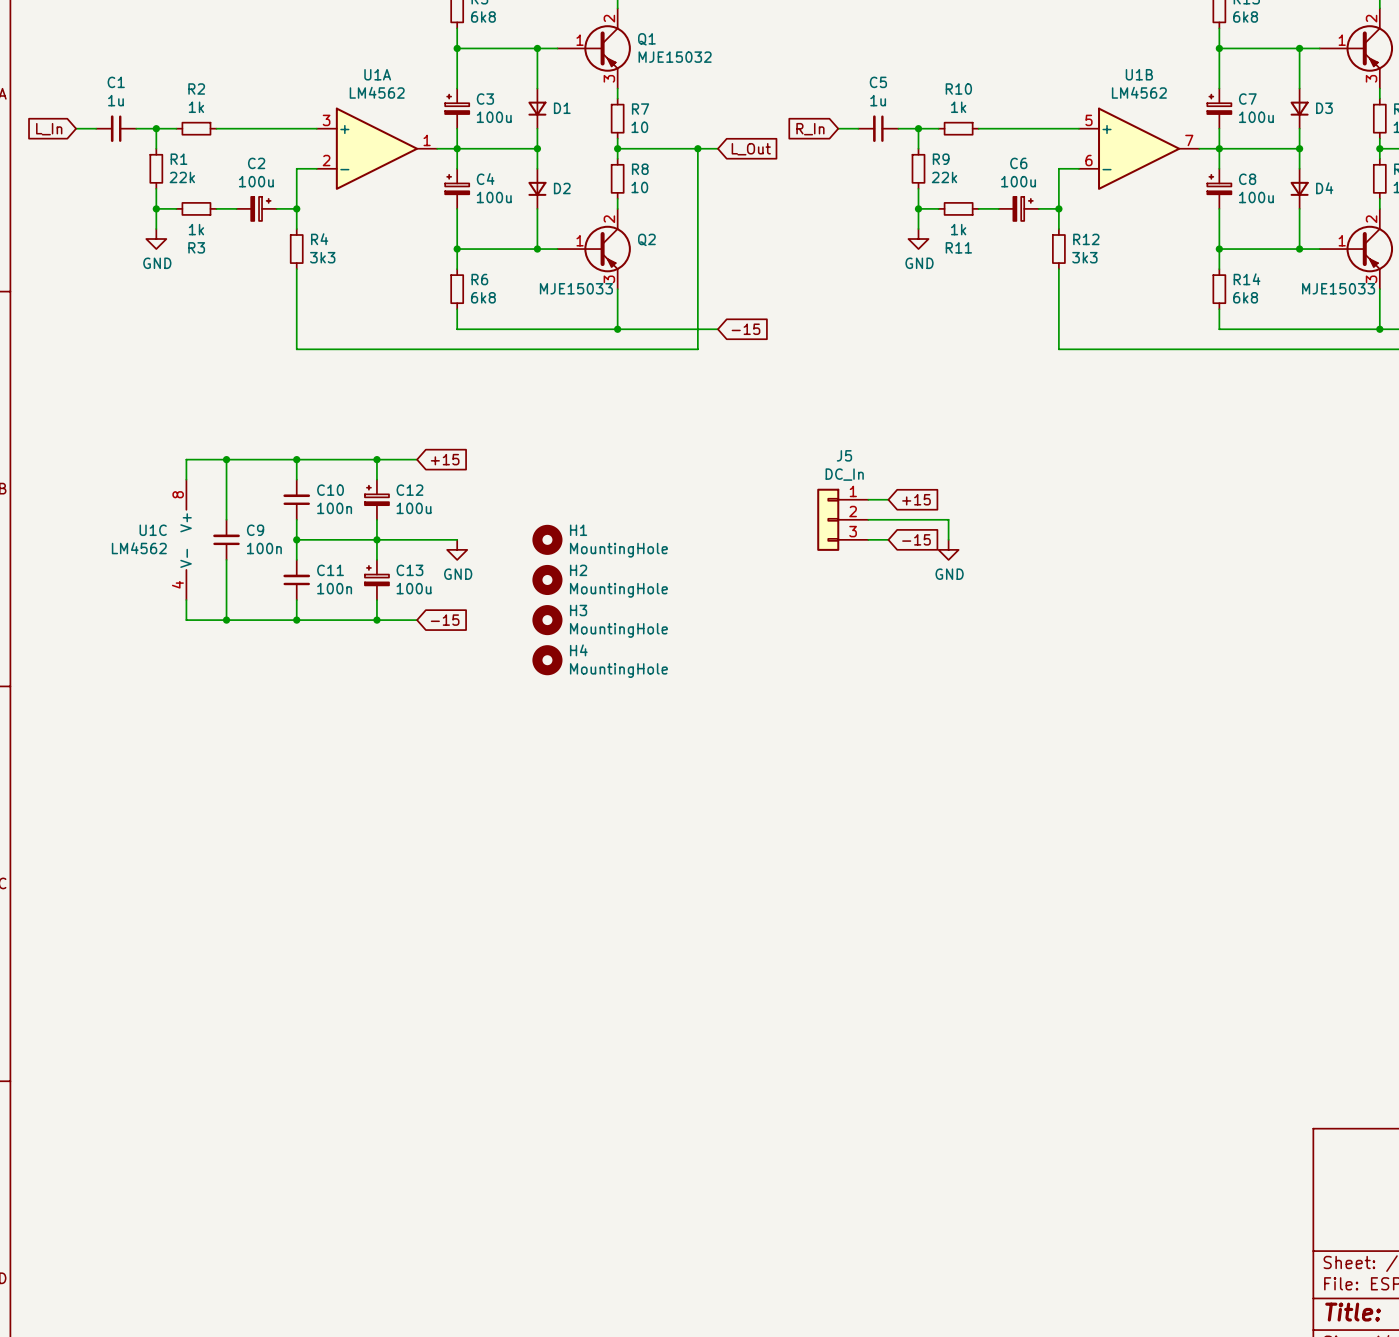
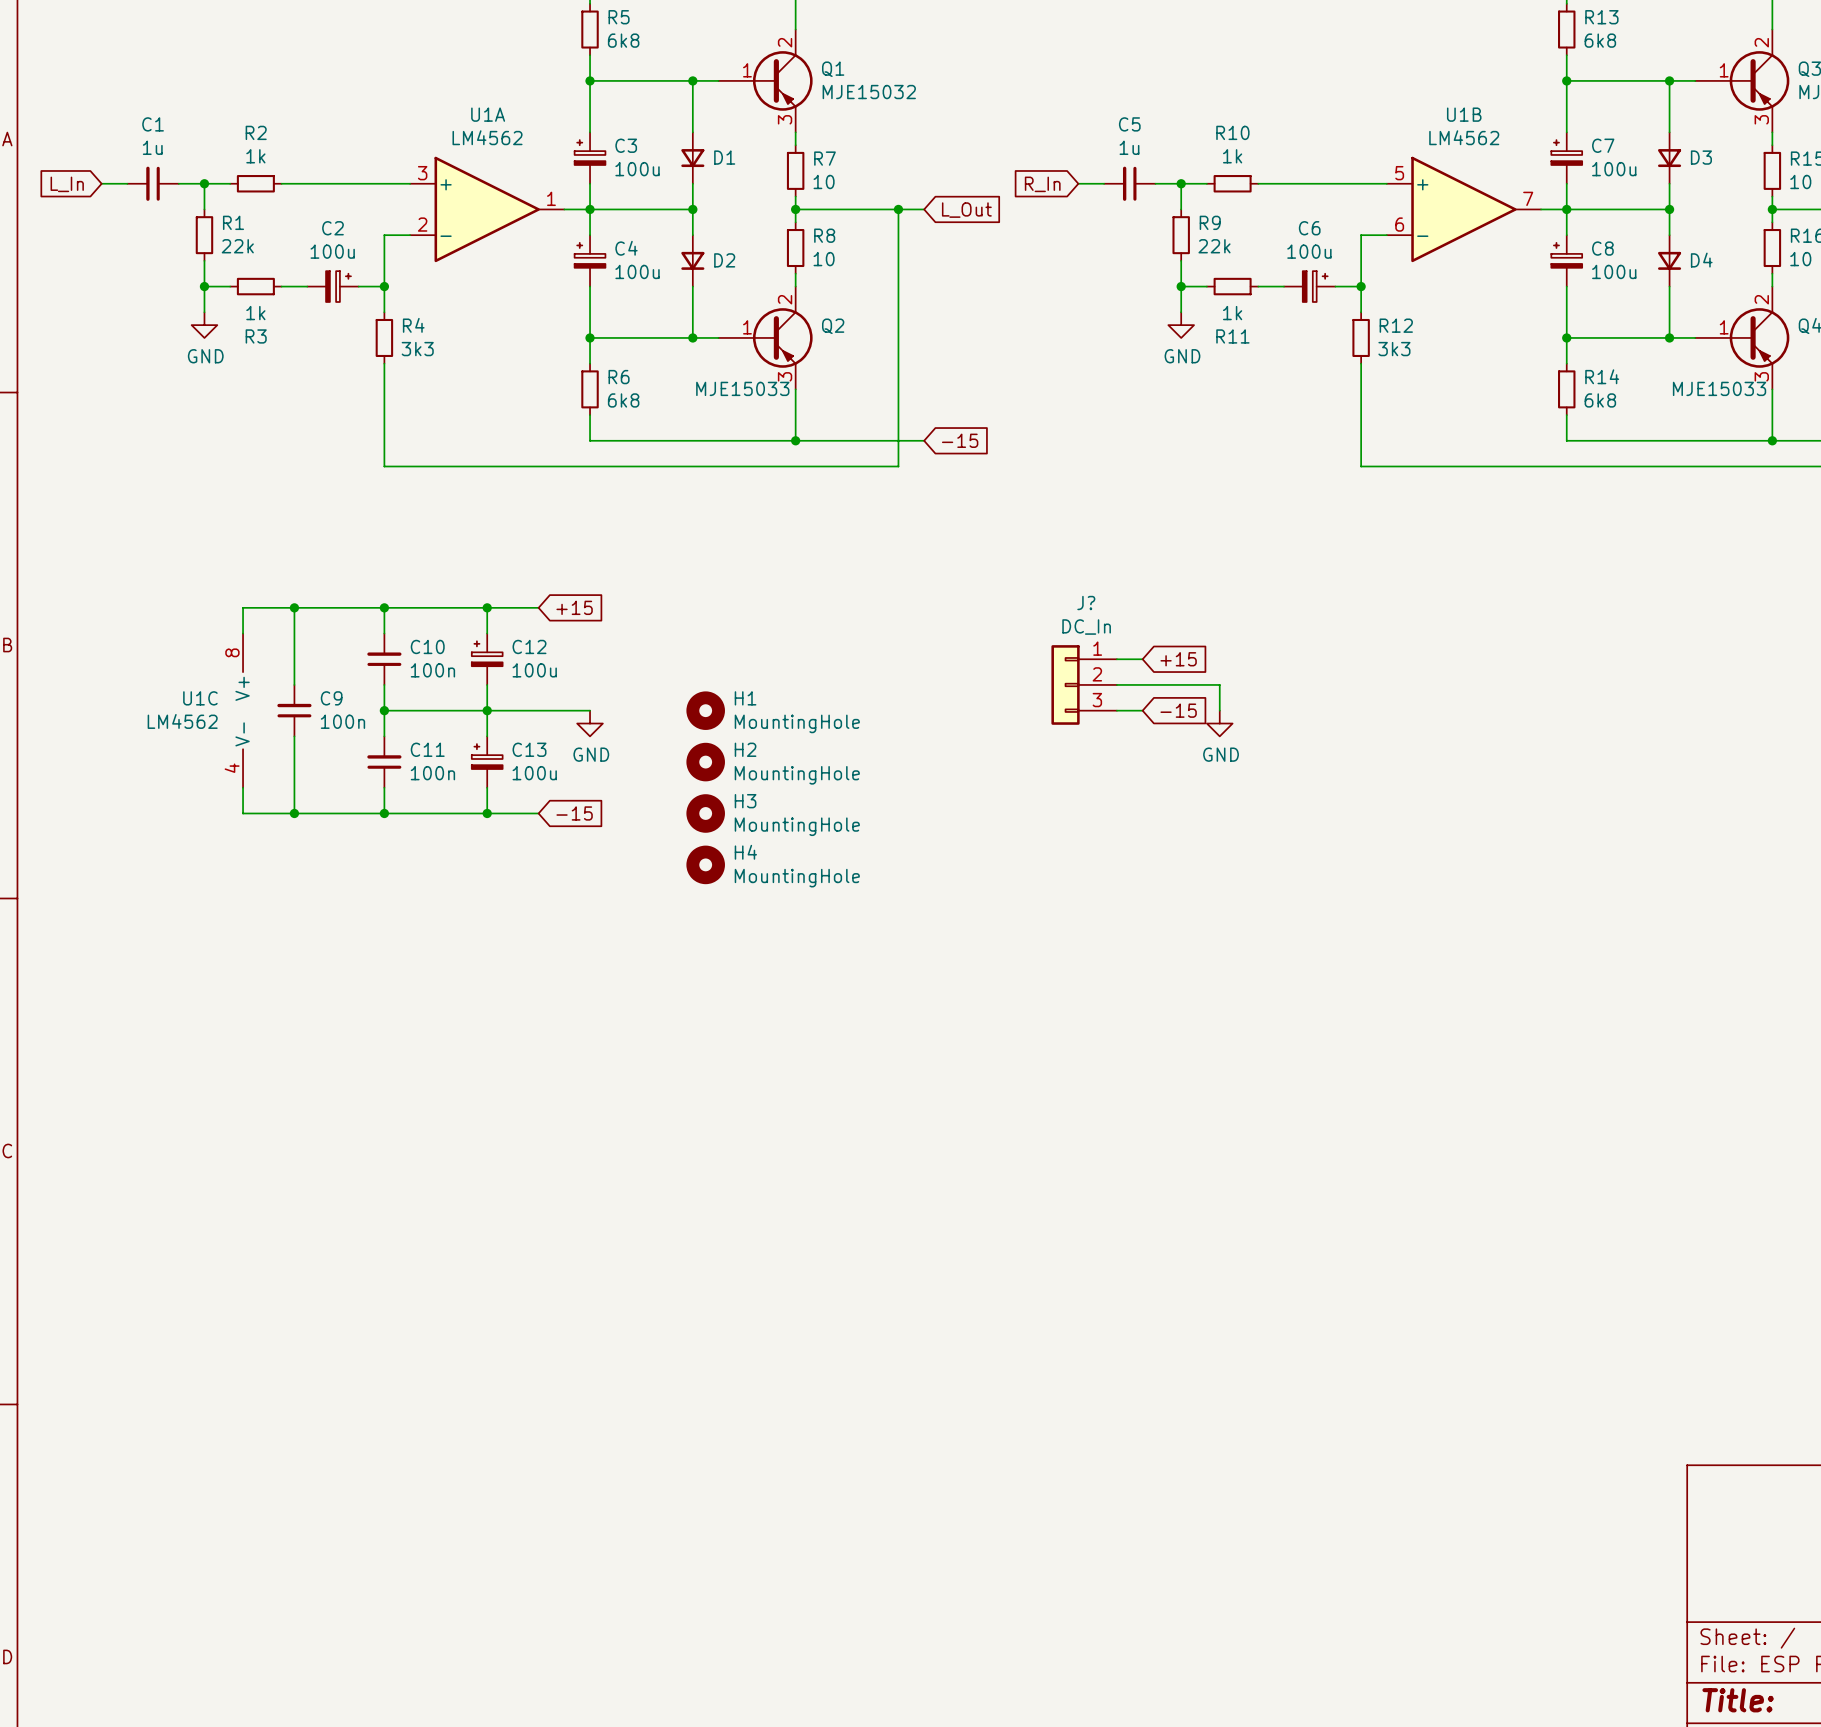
J5 name: J5 (844, 455) -> J? (1086, 603)

